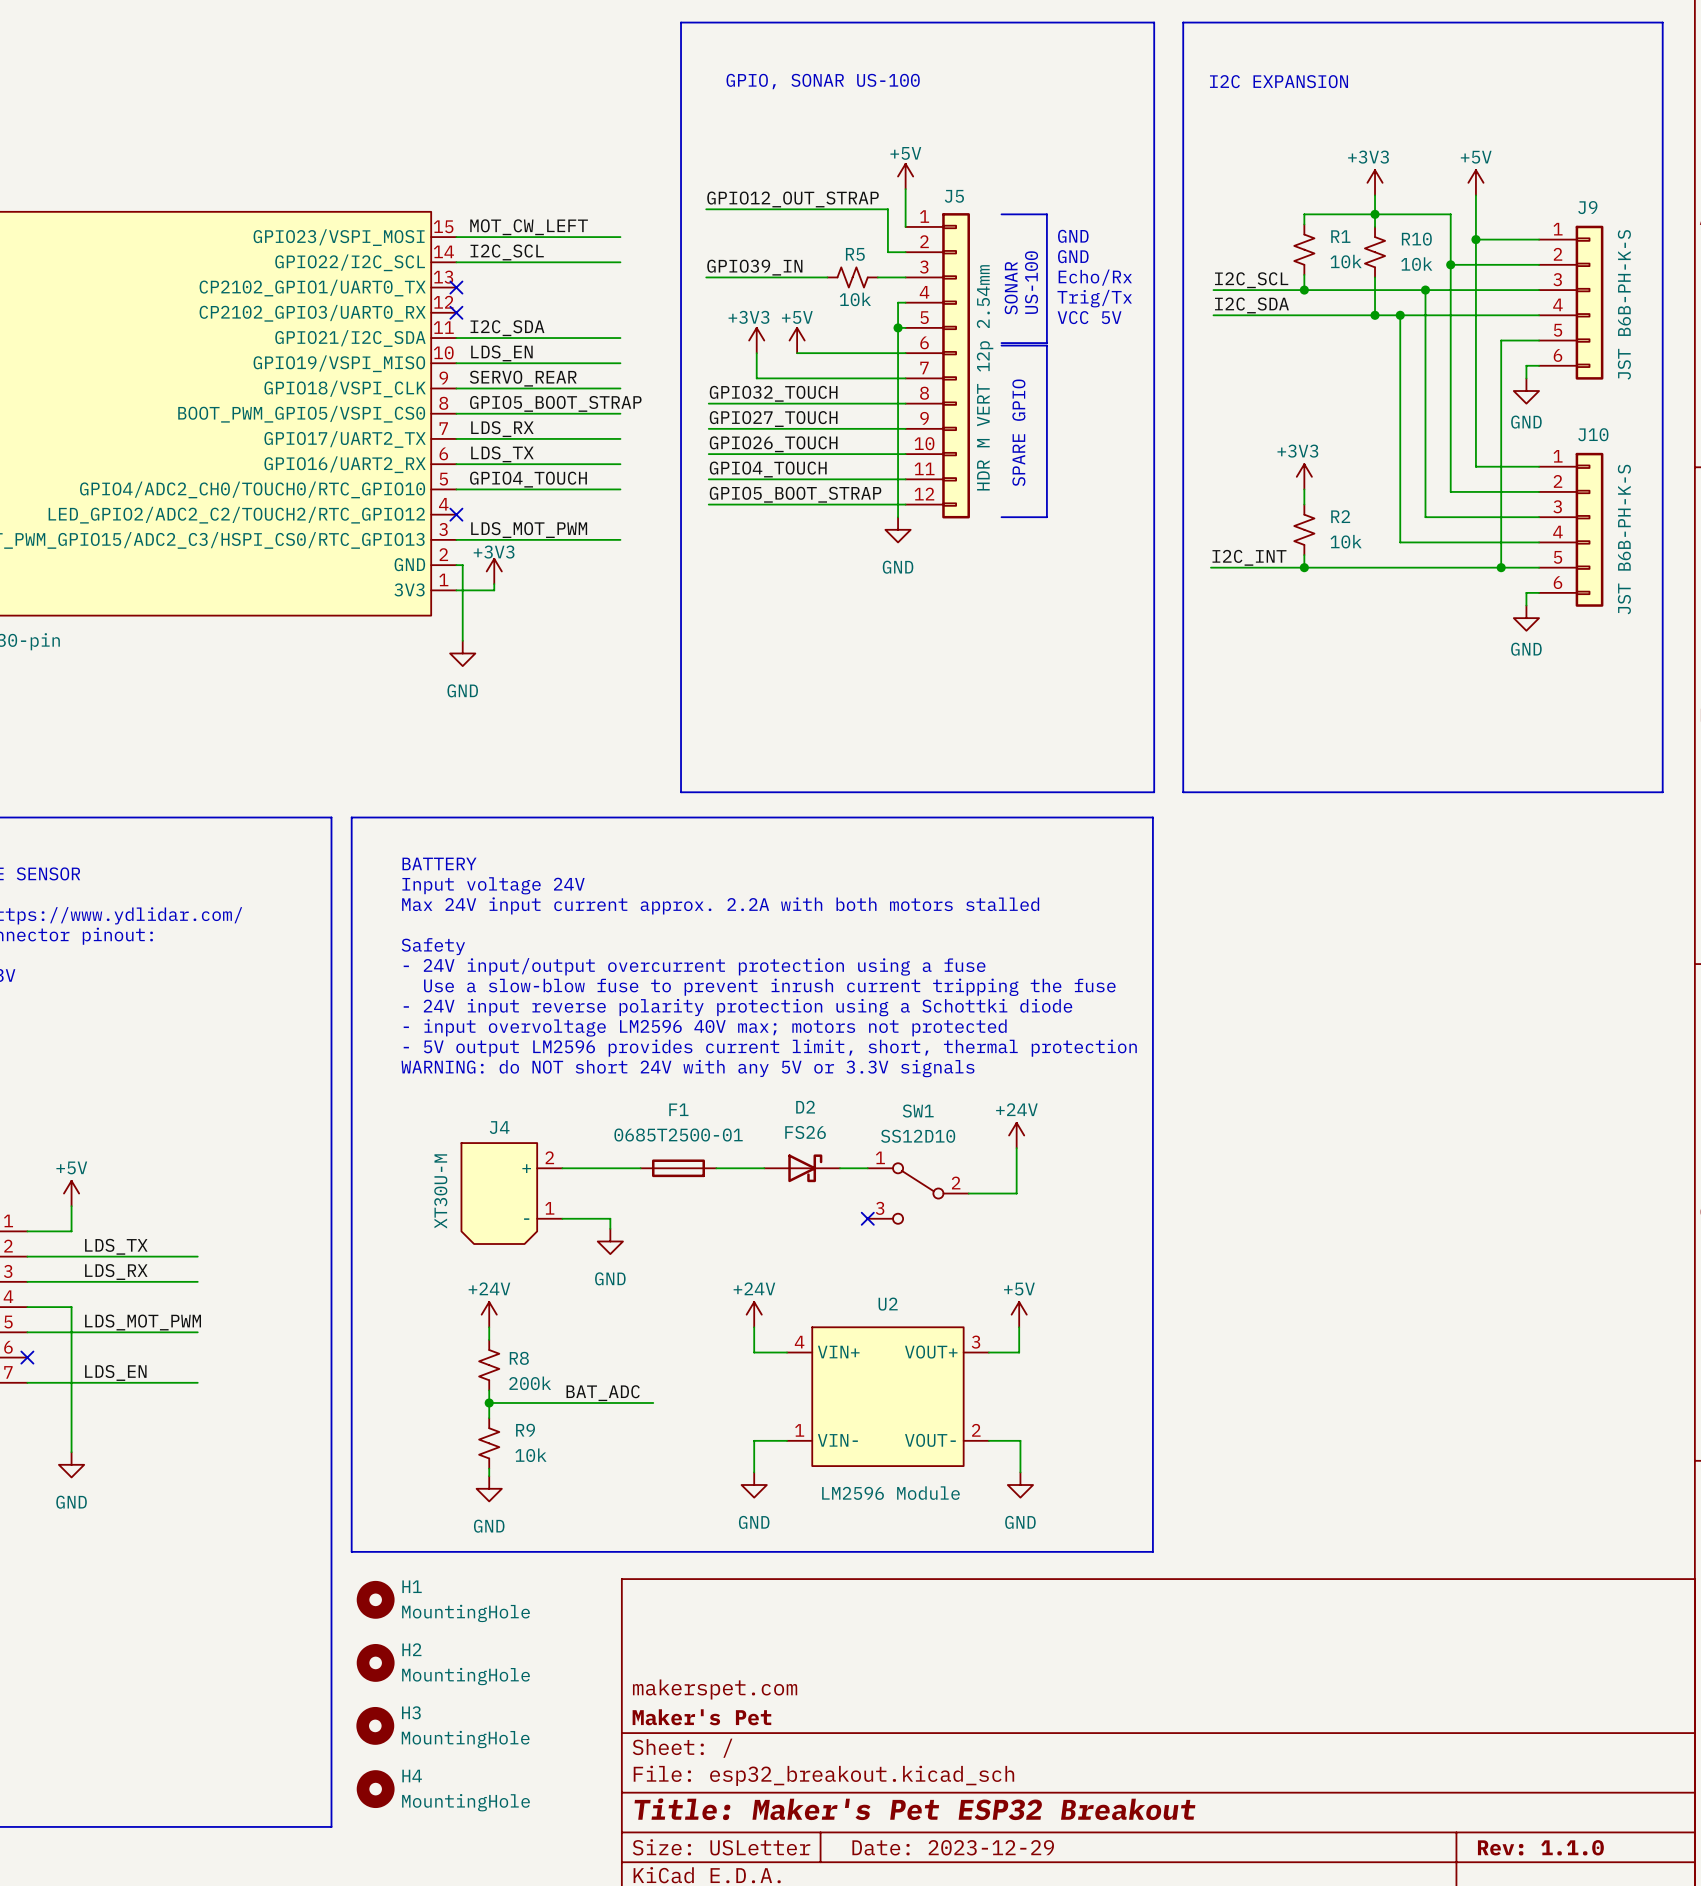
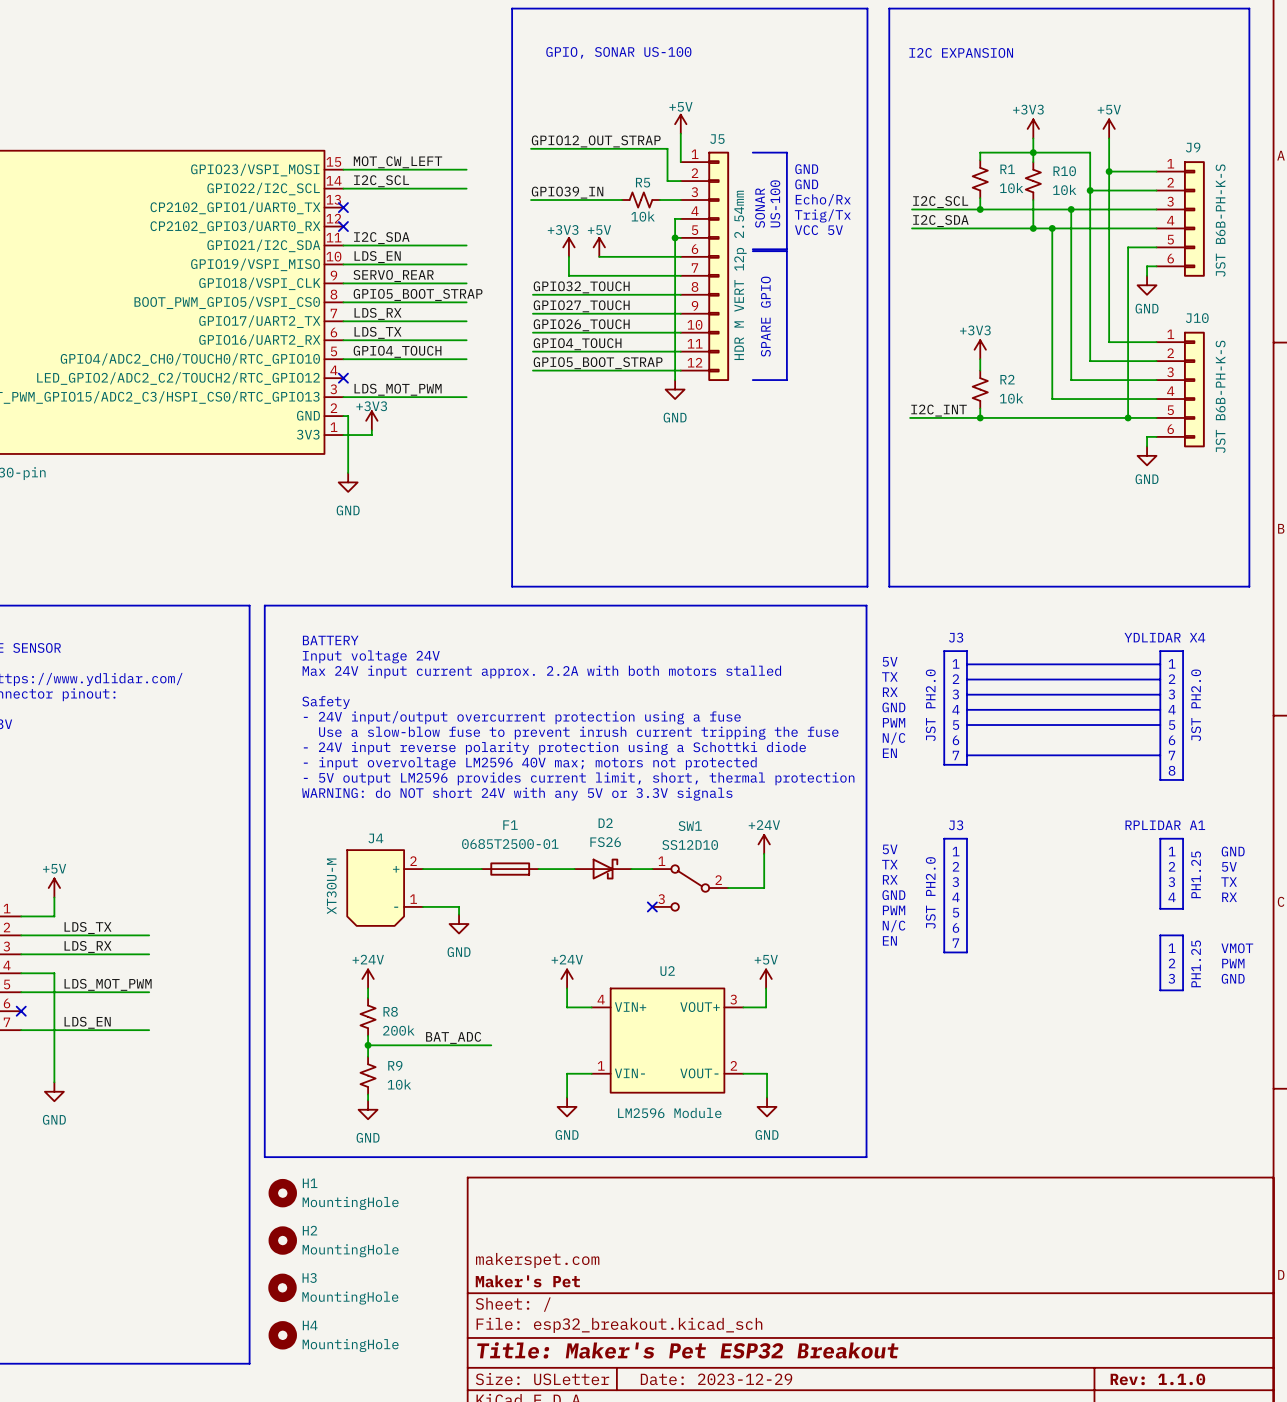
text: none -> J3 (956, 637)
text: none -> YDLIDAR X4 (1164, 637)
line: none -> (944, 651) (966, 651) (966, 764) (944, 764) (944, 651)
line: none -> (1160, 651) (1160, 779) (1183, 779) (1183, 651) (1160, 651)
text: none -> 5V (890, 661)
text: none -> 1 (956, 663)
line: none -> (966, 664) (1160, 664)
text: none -> 1 (1172, 663)
text: none -> TX (889, 676)
text: none -> 2 (956, 679)
line: none -> (966, 679) (1160, 679)
text: none -> 2 (1172, 679)
text: none -> RX (890, 692)
text: none -> 3 (955, 694)
text: none -> 3 (1171, 694)
line: none -> (966, 694) (1160, 694)
text: none -> JST PH2.0 (930, 705)
text: none -> JST PH2.0 (1196, 705)
text: none -> GND (893, 707)
text: none -> 4 (955, 709)
line: none -> (966, 709) (1160, 709)
text: none -> 4 (1172, 709)
text: none -> PWM (894, 722)
text: none -> 5 (956, 725)
line: none -> (966, 725) (1160, 725)
text: none -> 5 (1172, 725)
text: none -> N/C (894, 738)
text: none -> 6 (955, 740)
text: none -> 6 (1172, 740)
text: none -> EN (889, 753)
line: none -> (966, 755) (1160, 755)
text: none -> 7 (955, 755)
text: none -> 7 (1172, 755)
text: none -> 8 (1172, 770)
text: none -> J3 (956, 825)
text: none -> RPLIDAR A1 (1165, 825)
line: none -> (944, 838) (966, 838) (966, 952) (944, 952) (944, 838)
line: none -> (1160, 838) (1183, 838) (1183, 908) (1160, 908) (1160, 838)
text: none -> 5V (890, 849)
text: none -> GND (1233, 851)
text: none -> 1 (956, 851)
text: none -> 1 (1172, 851)
text: none -> TX (889, 864)
text: none -> 2 (956, 866)
text: none -> 2 (1172, 866)
text: none -> 5V (1229, 866)
text: none -> PH1.25 (1196, 874)
text: none -> RX (890, 879)
text: none -> 3 (955, 882)
text: none -> 3 (1171, 882)
text: none -> TX (1229, 882)
text: none -> JST PH2.0 (930, 892)
text: none -> GND (893, 895)
text: none -> 4 (955, 897)
text: none -> 4 (1172, 897)
text: none -> RX (1229, 897)
text: none -> PWM (894, 910)
text: none -> 5 (956, 912)
text: none -> N/C (894, 926)
text: none -> 6 (955, 927)
line: none -> (1160, 935) (1160, 990) (1183, 990) (1183, 935) (1160, 935)
text: none -> EN (889, 940)
text: none -> 7 (955, 943)
text: none -> 1 (1172, 948)
text: none -> VMOT (1237, 948)
text: none -> 2 (1172, 963)
text: none -> PH1.25 (1196, 963)
text: none -> PWM (1233, 963)
text: none -> 3 (1171, 978)
text: none -> GND (1233, 978)

